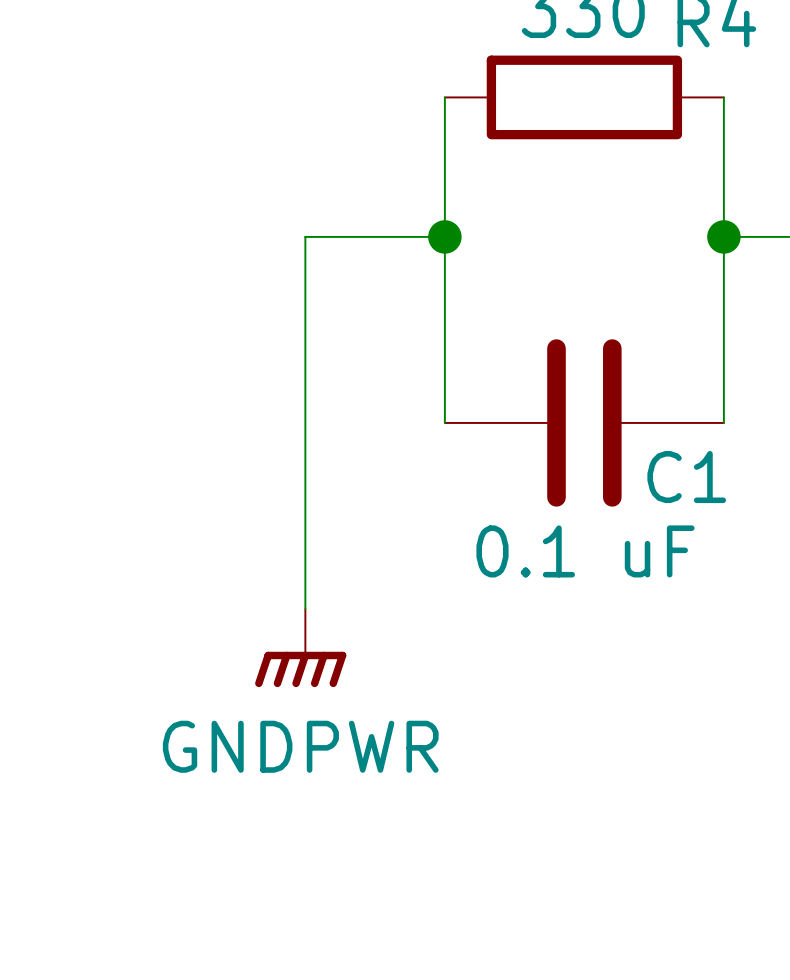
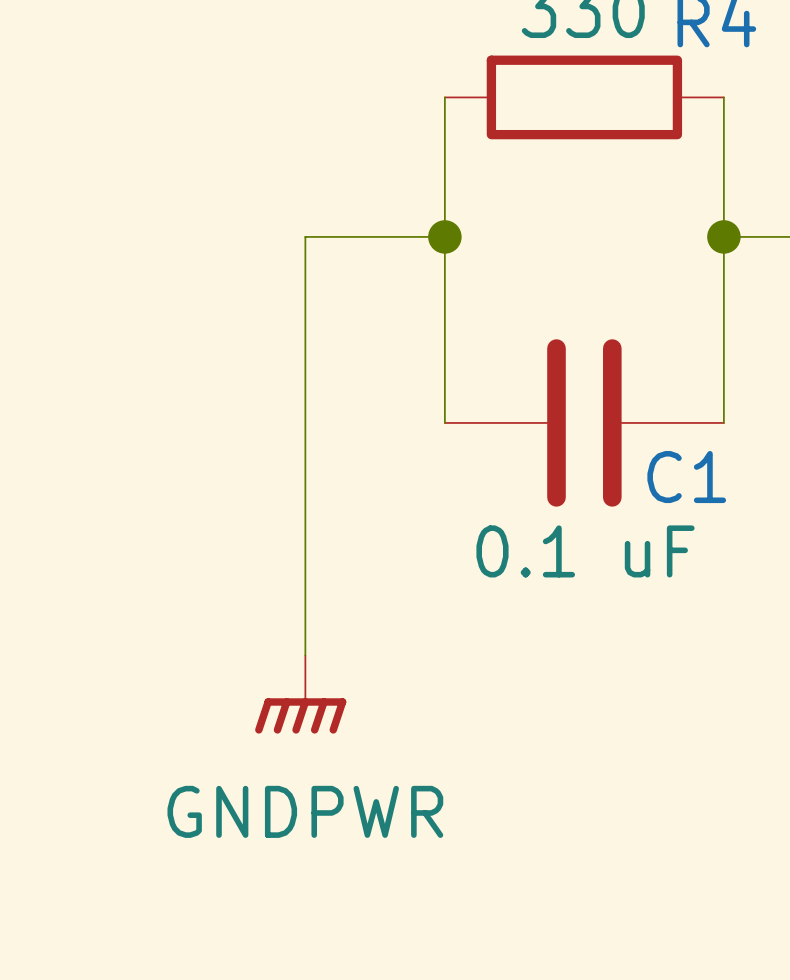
power symbol position: GNDPWR (300, 648) -> GNDPWR (300, 694)
power symbol text position: GNDPWR (300, 746) -> GNDPWR (305, 811)

